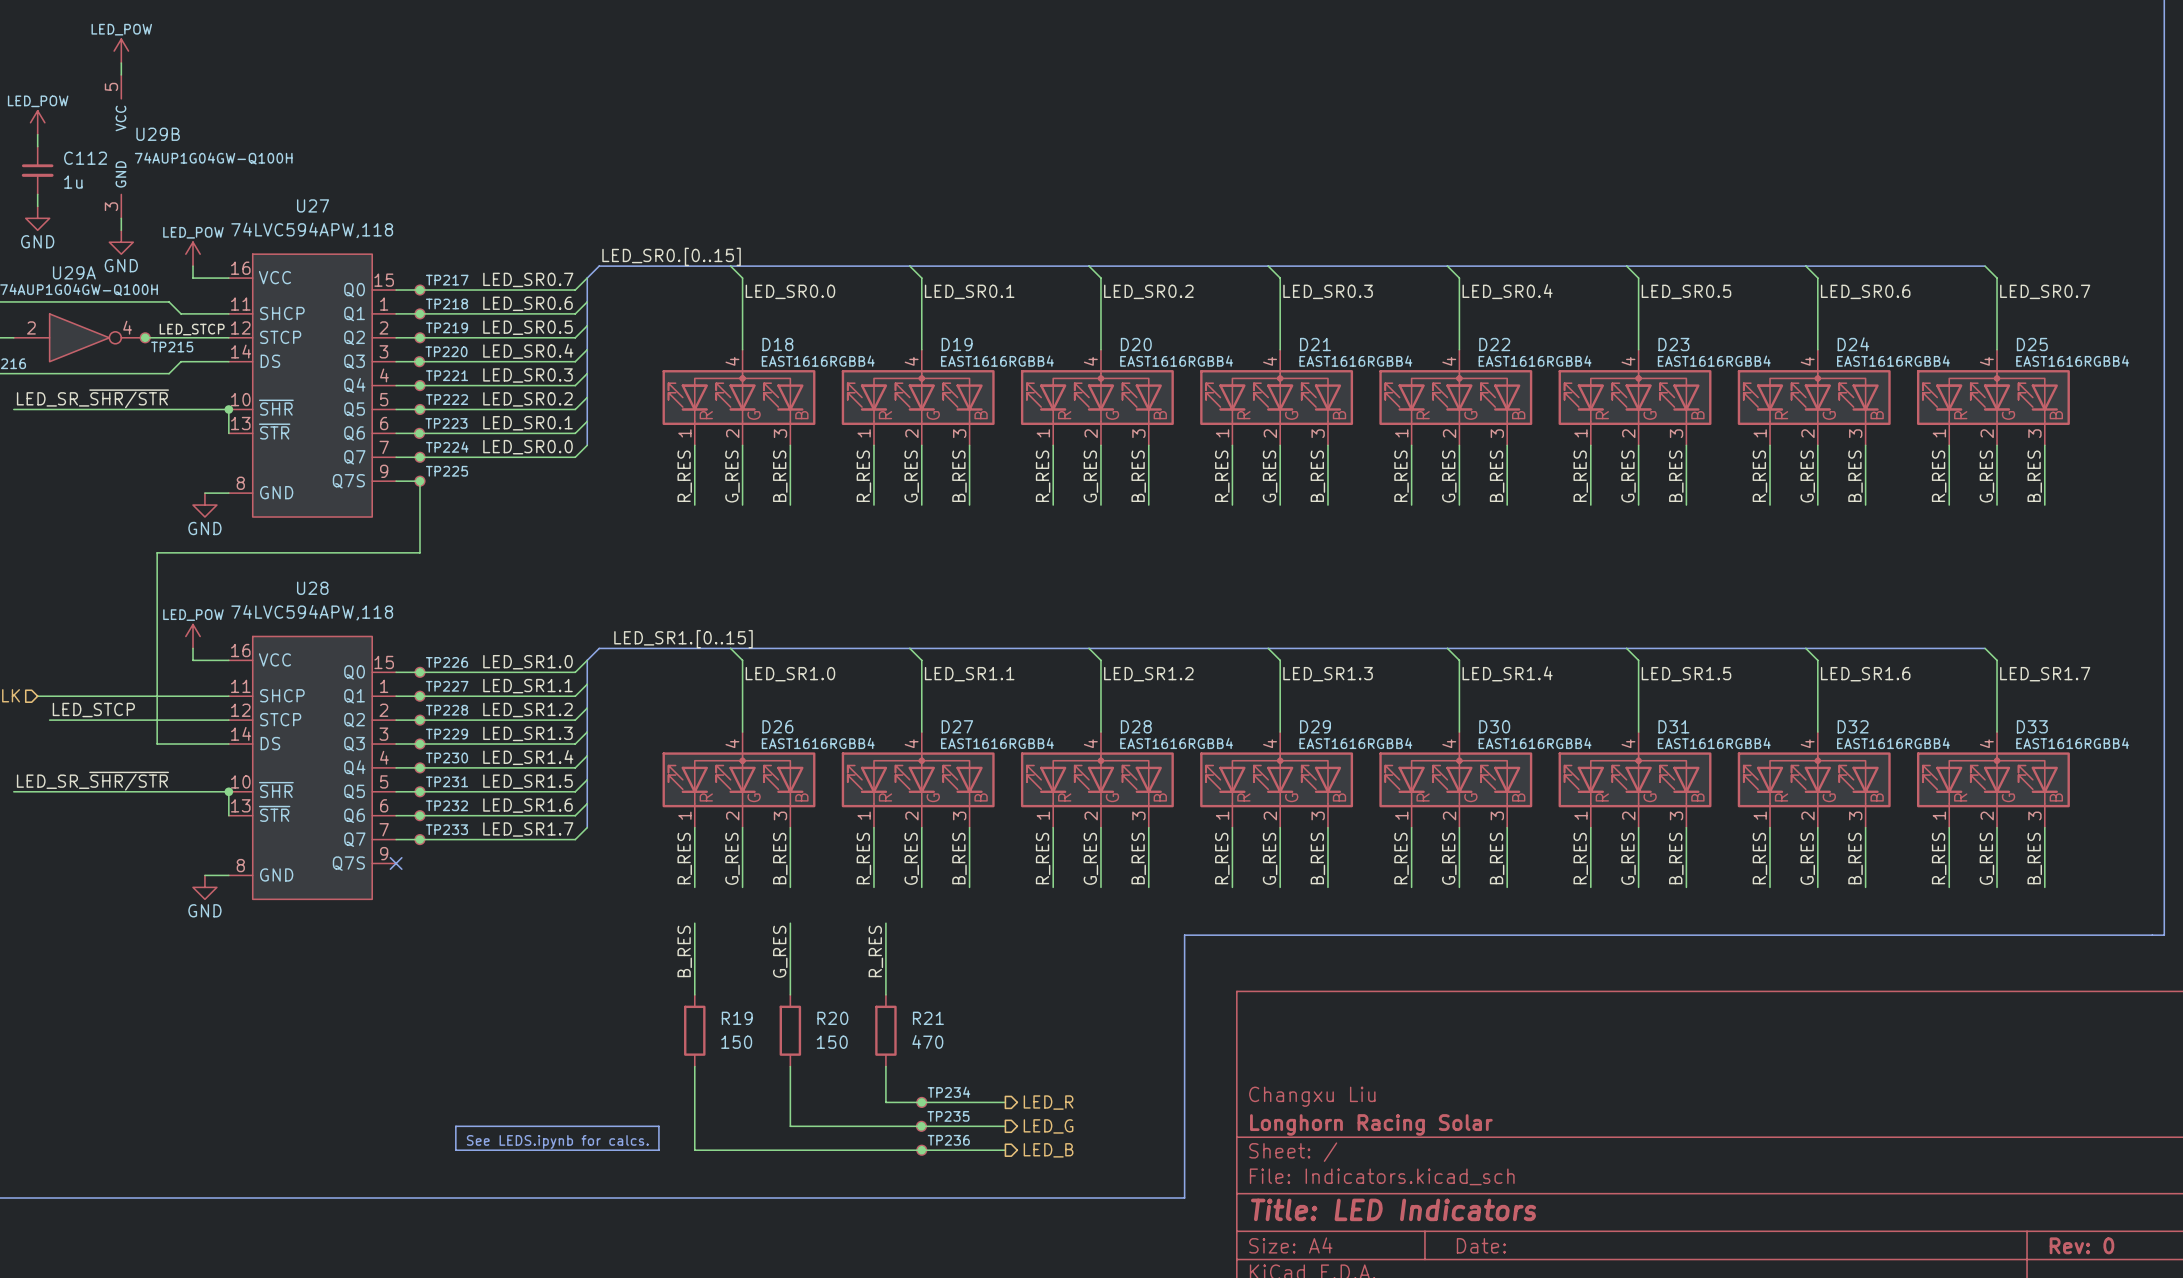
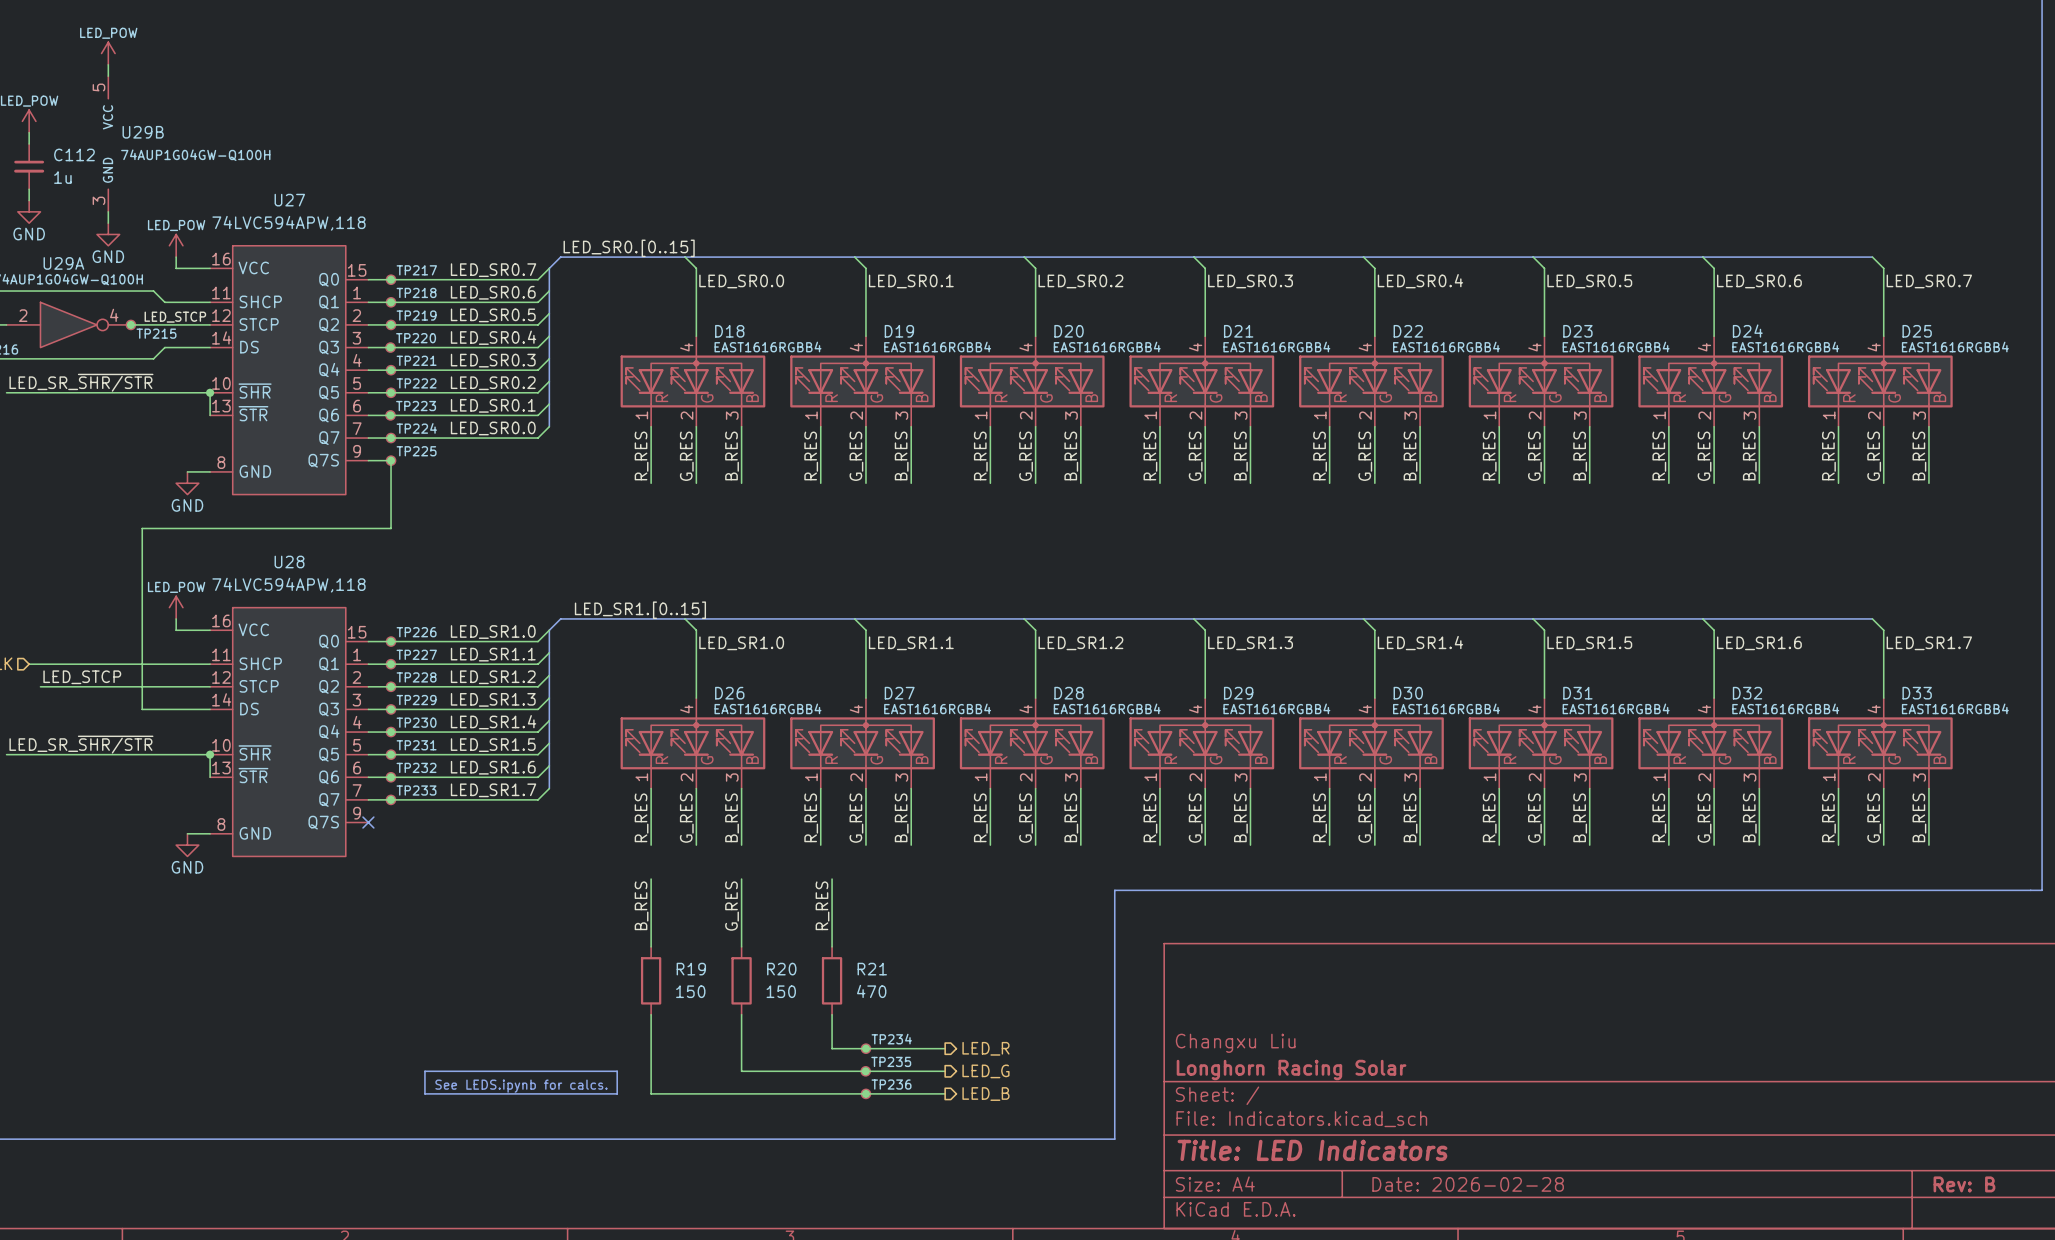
title block: Date: (1481, 1245) -> Date: 2026-02-28 (1468, 1184)
title block: Rev: 0 (2081, 1245) -> Rev: B (1964, 1184)

